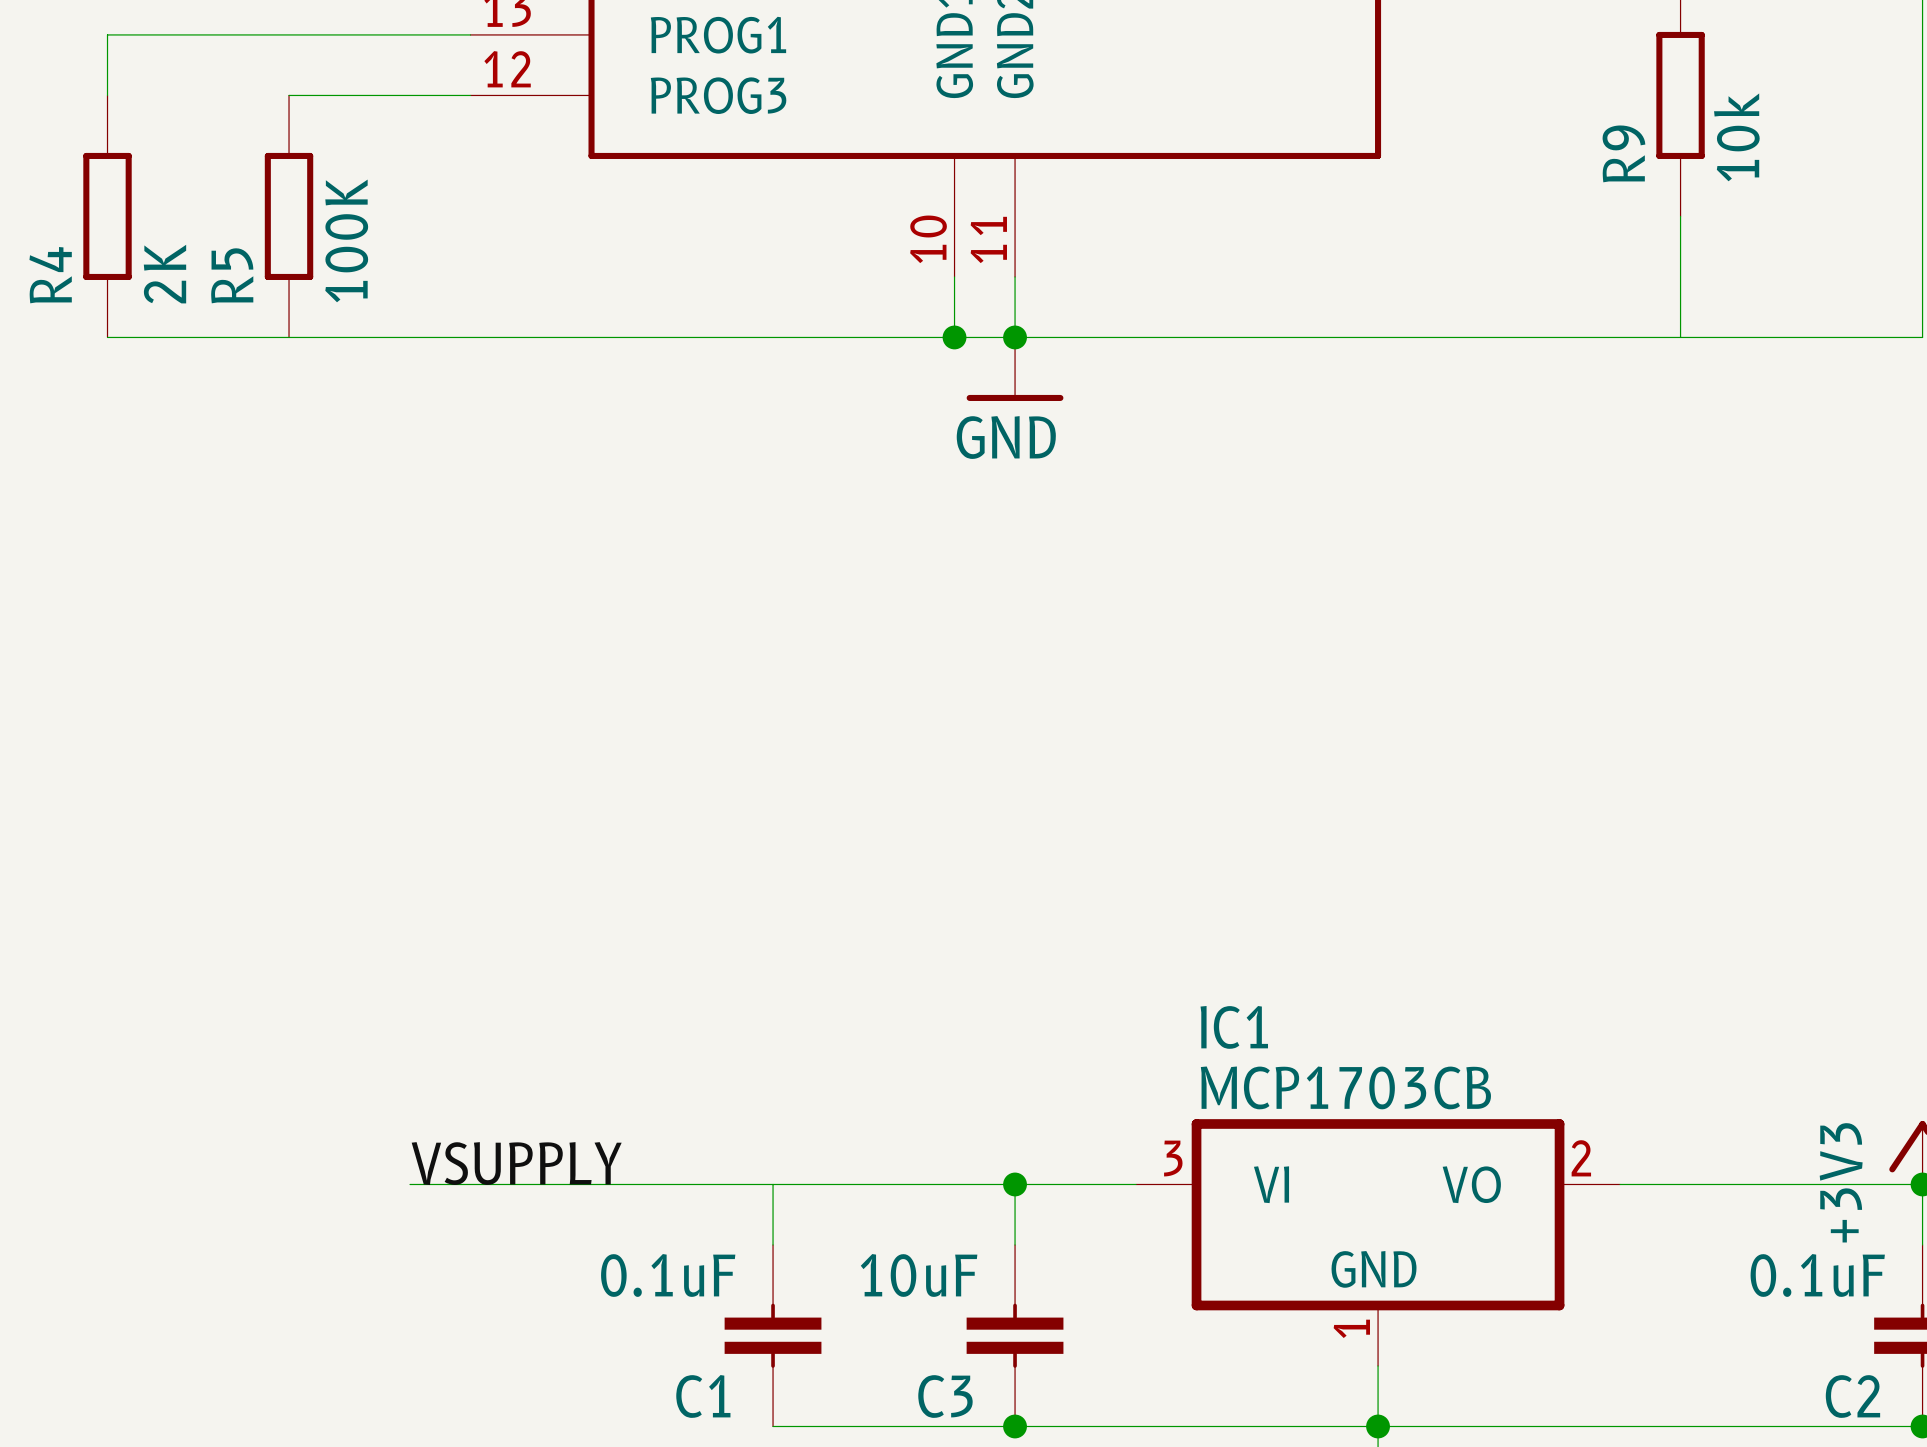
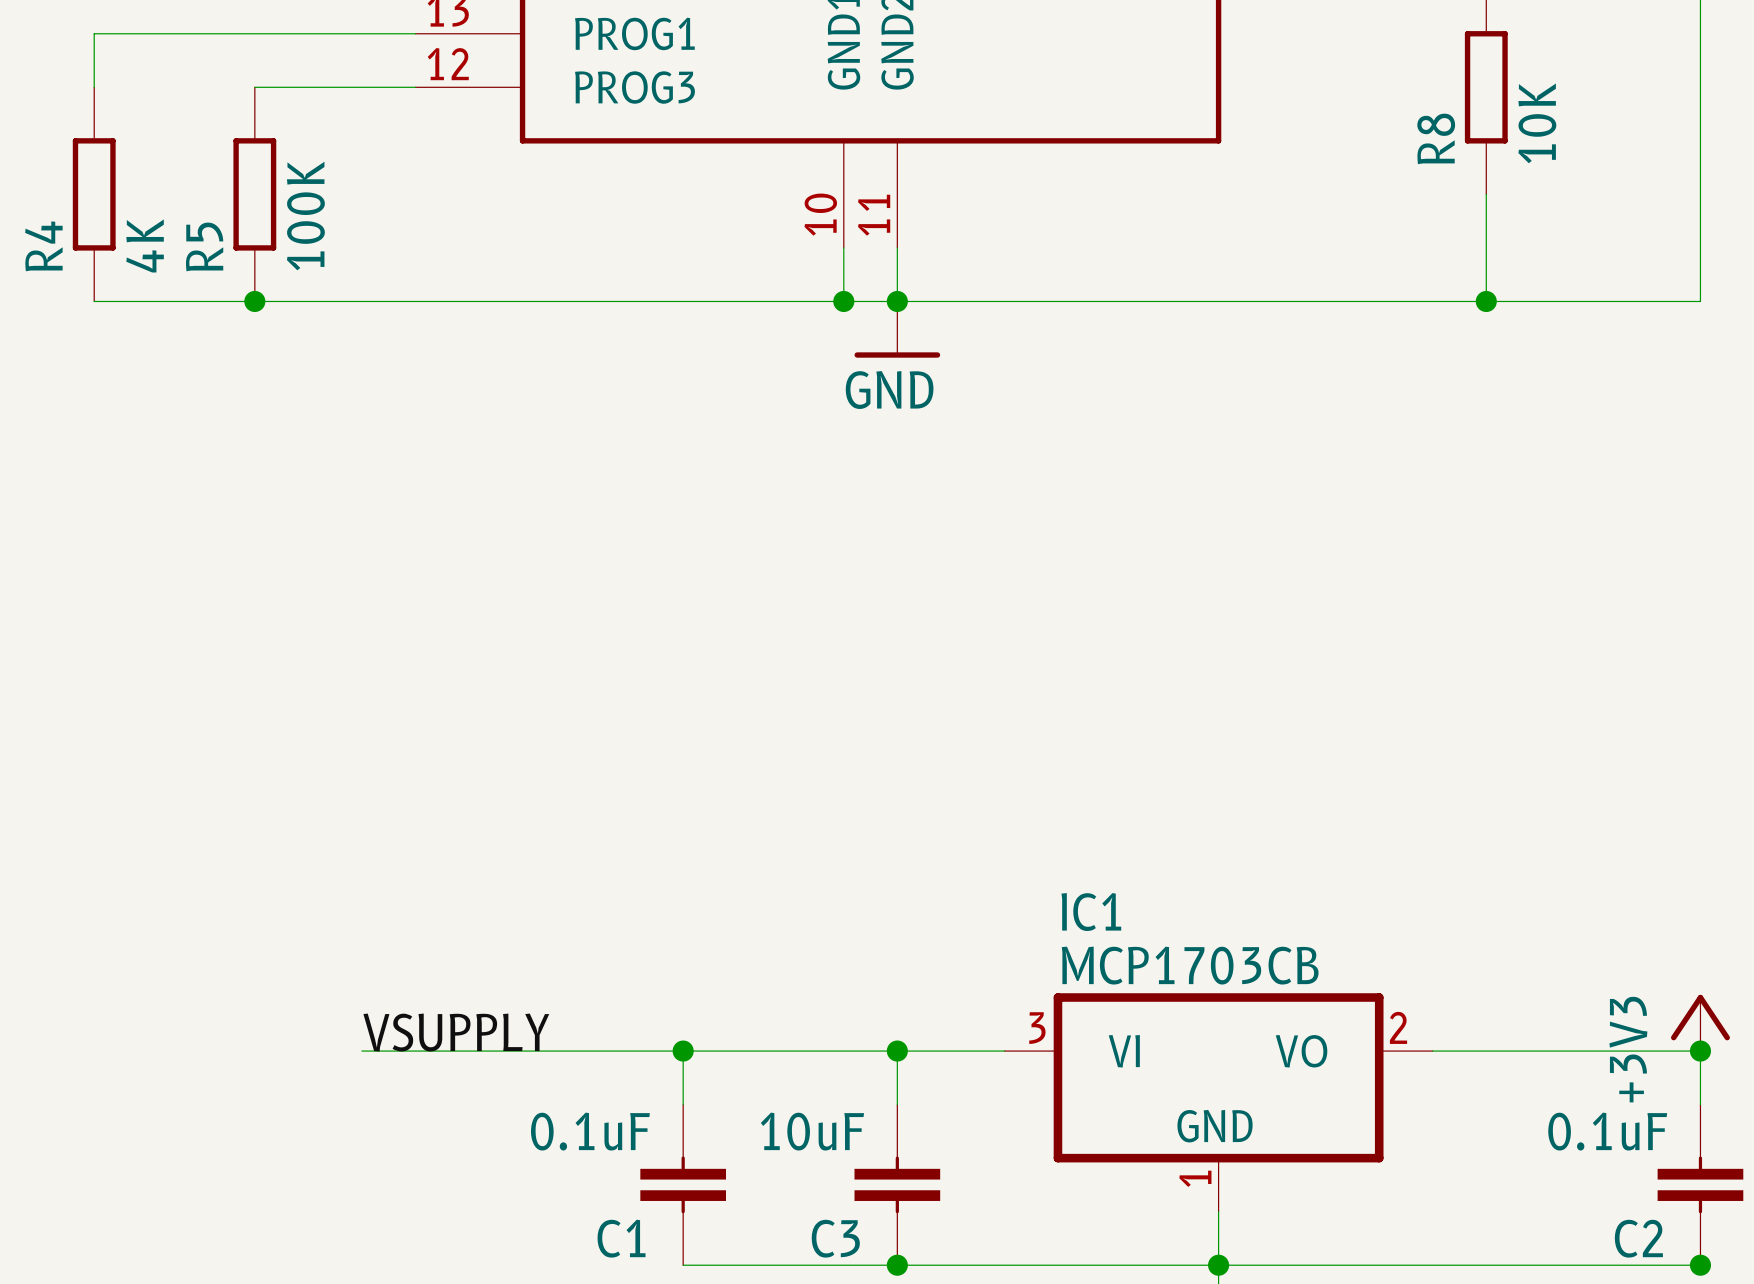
R9 value: 10k (1736, 137) -> 10K (1537, 123)
R9 name: R9 (1623, 153) -> R8 (1436, 138)
R4 value: 2K (164, 274) -> 4K (145, 245)
junction: none -> (254, 301)
junction: none -> (1486, 301)
junction: none -> (683, 1051)

